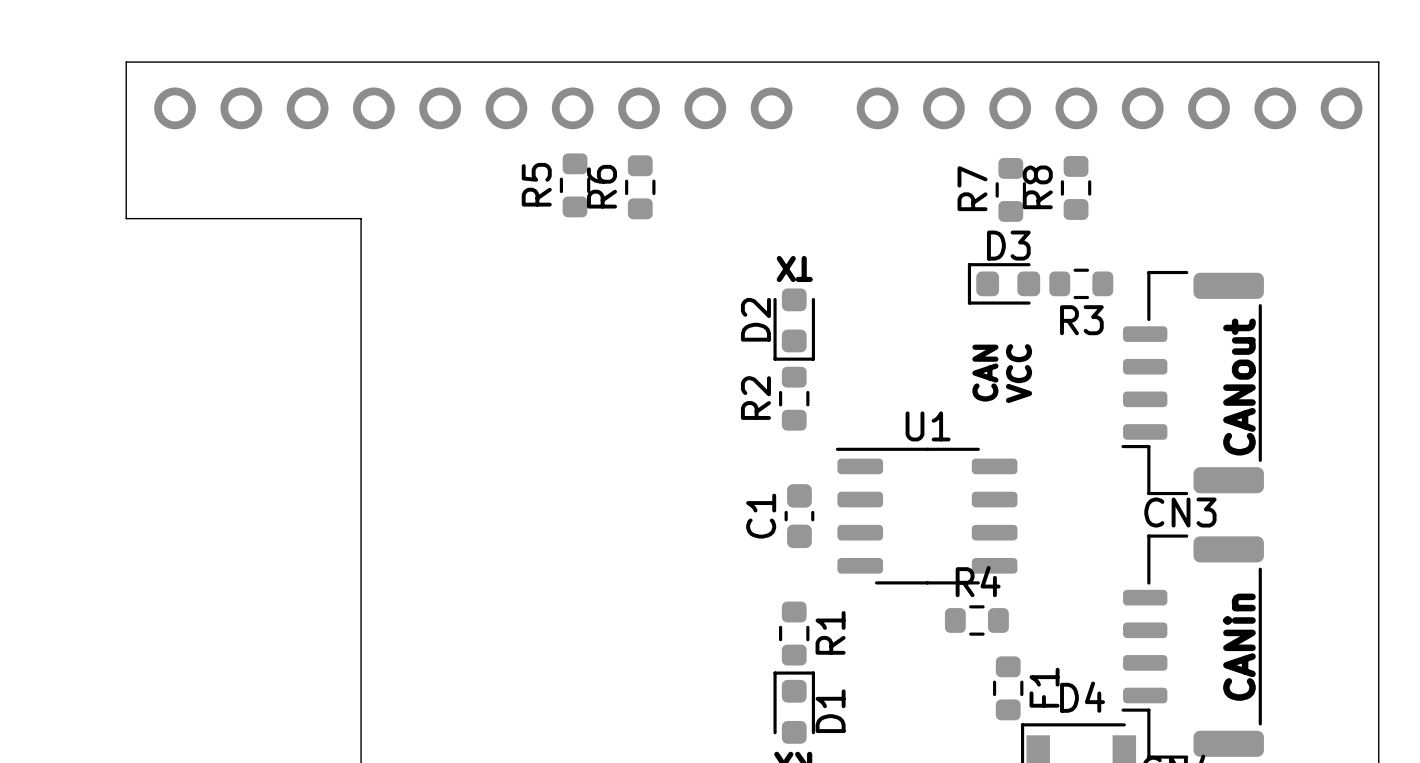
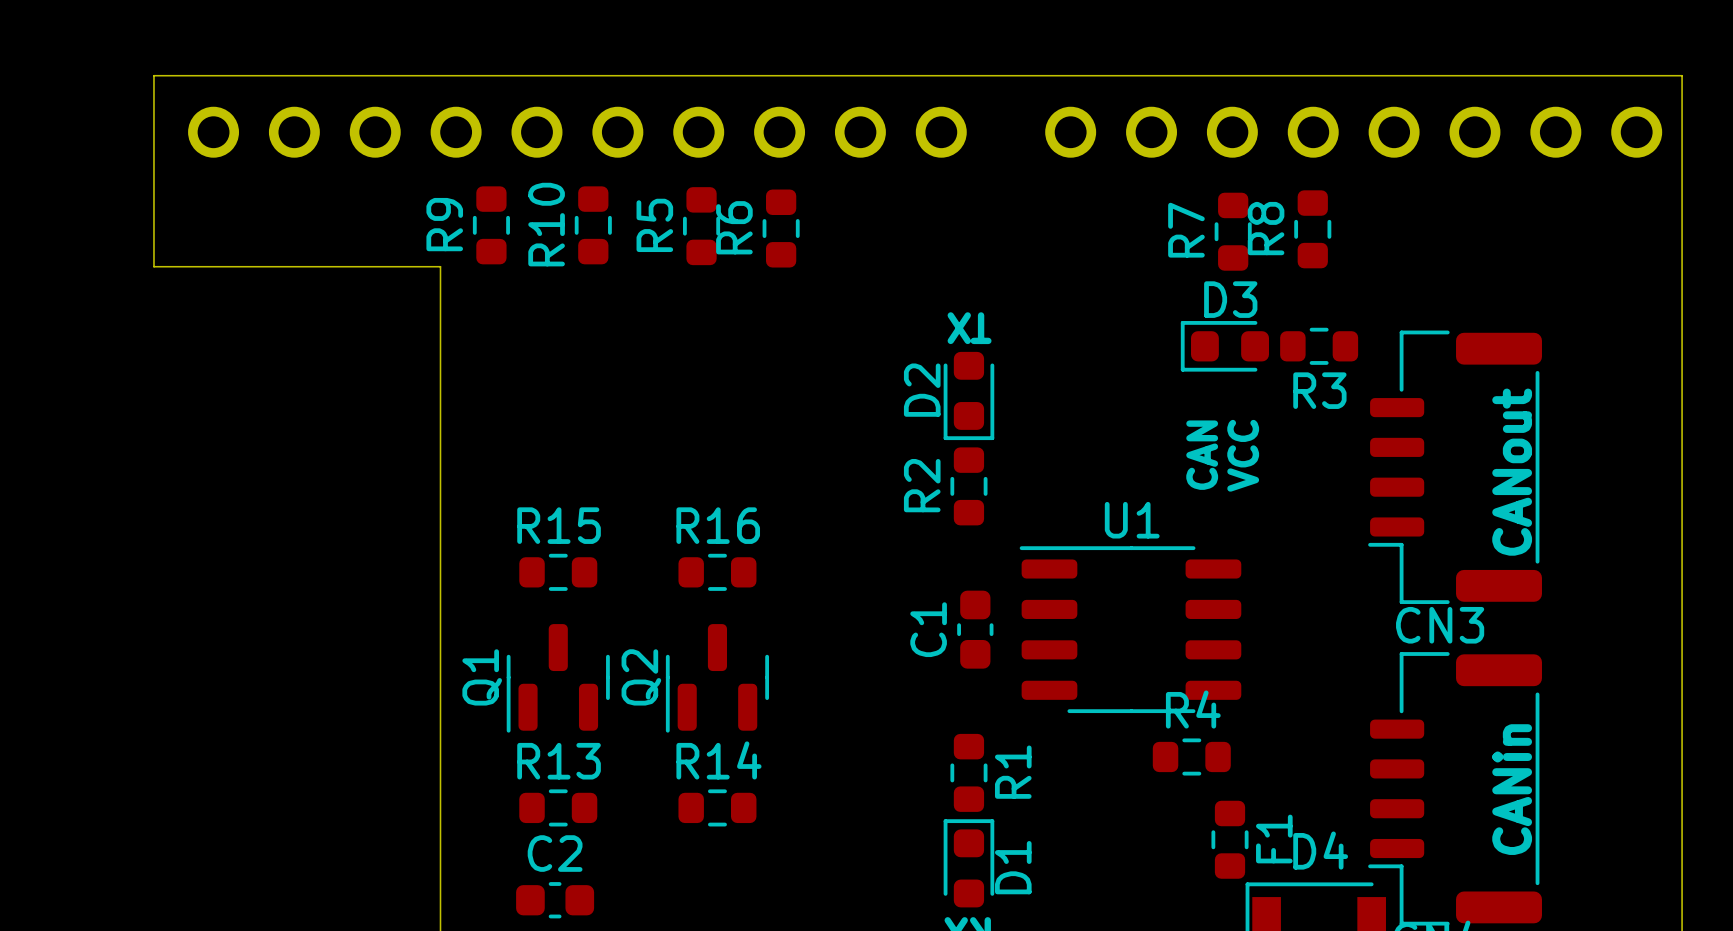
R9: none -> (491, 225)
R10: none -> (593, 225)
R15: none -> (558, 572)
R16: none -> (717, 572)
Q1: none -> (558, 678)
Q2: none -> (717, 678)
R13: none -> (558, 807)
R14: none -> (717, 807)
C2: none -> (555, 900)

